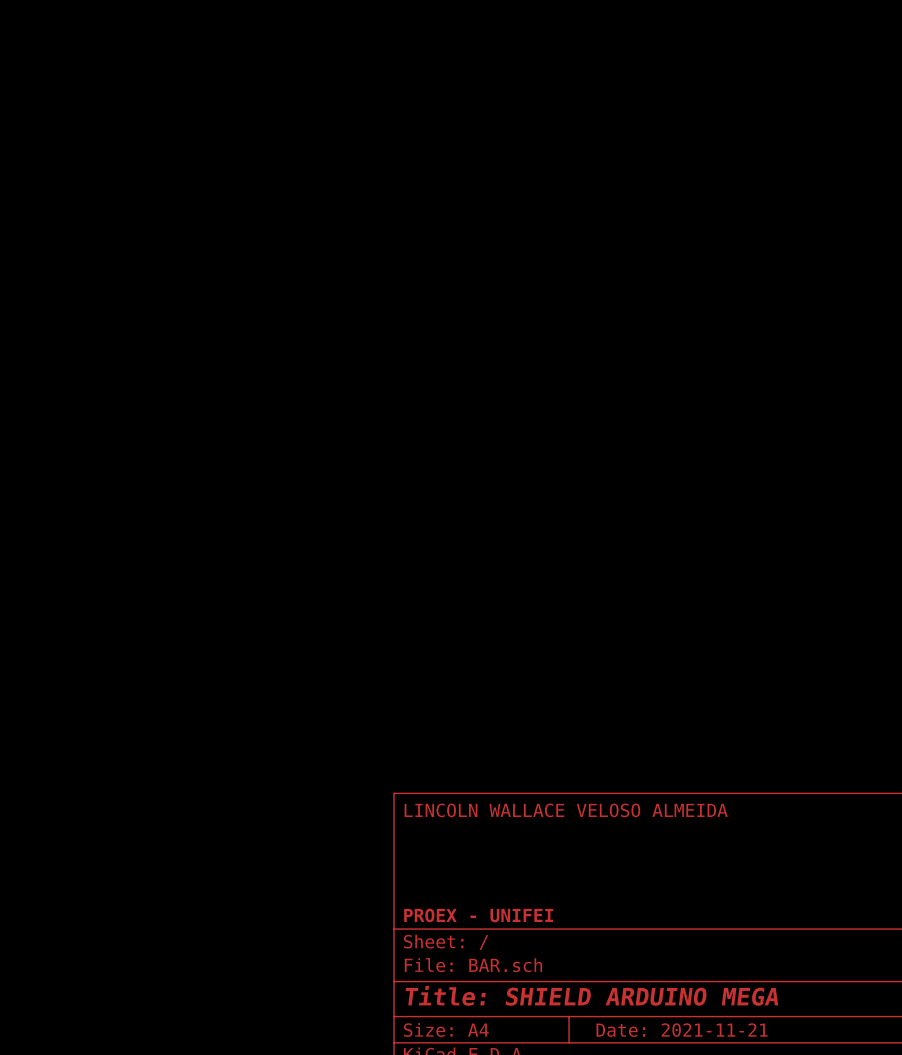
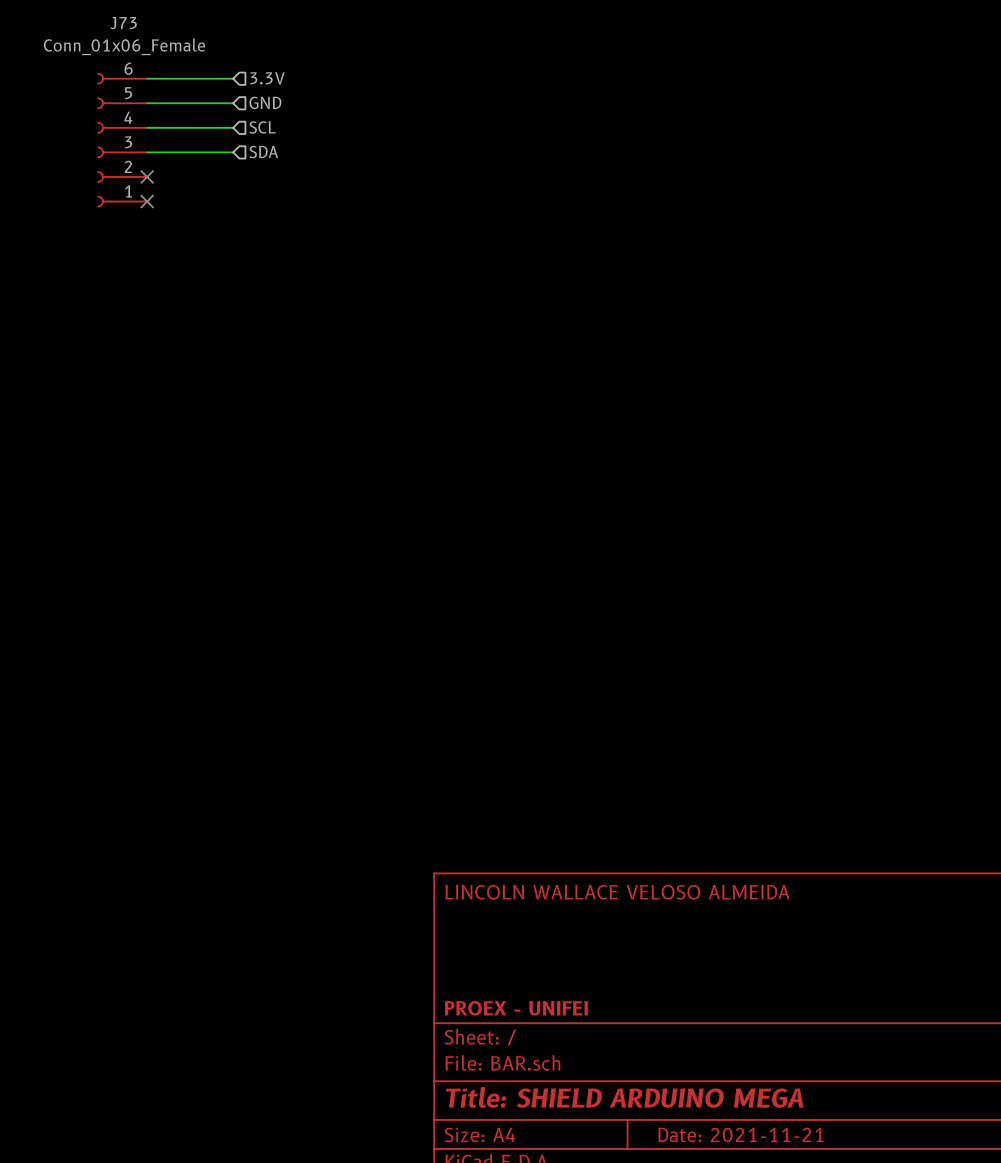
wire: none -> (147, 78) (233, 78)
hierarchical label: none -> 3.3V (267, 78)
hierarchical label: none -> GND (265, 102)
wire: none -> (147, 103) (233, 103)
wire: none -> (147, 127) (233, 127)
hierarchical label: none -> SCL (262, 127)
J73: none -> Conn_01x06_Female (122, 140)
wire: none -> (147, 152) (233, 152)
hierarchical label: none -> SDA (263, 152)
no-connect mark: none -> (147, 176)
no-connect mark: none -> (147, 201)

